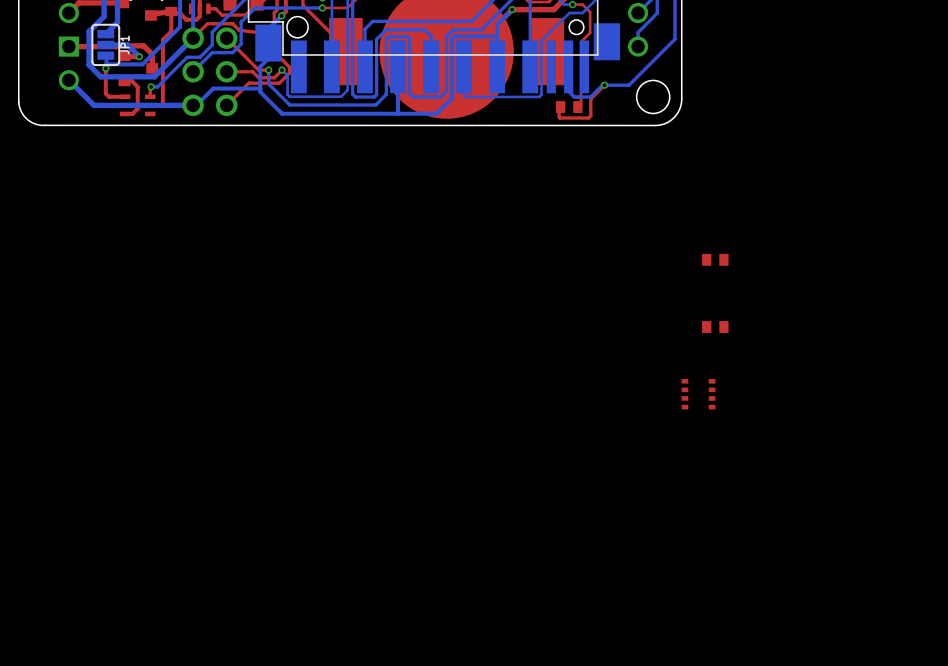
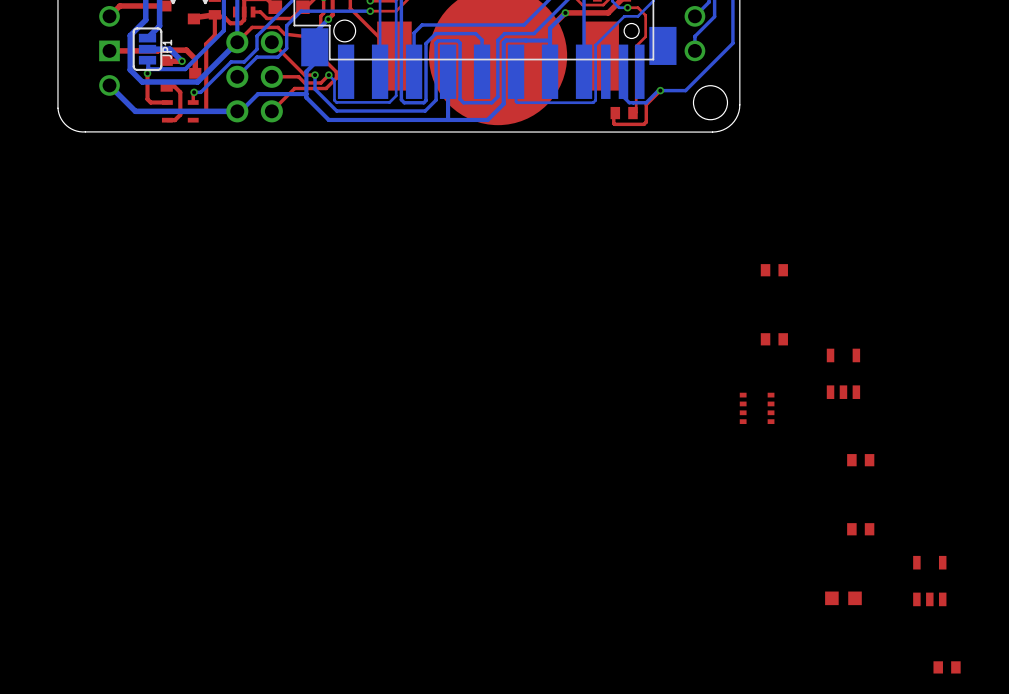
part: none -> (843, 373)
part: none -> (860, 460)
part: none -> (860, 529)
part: none -> (929, 581)
part: none -> (843, 598)
part: none -> (947, 667)

